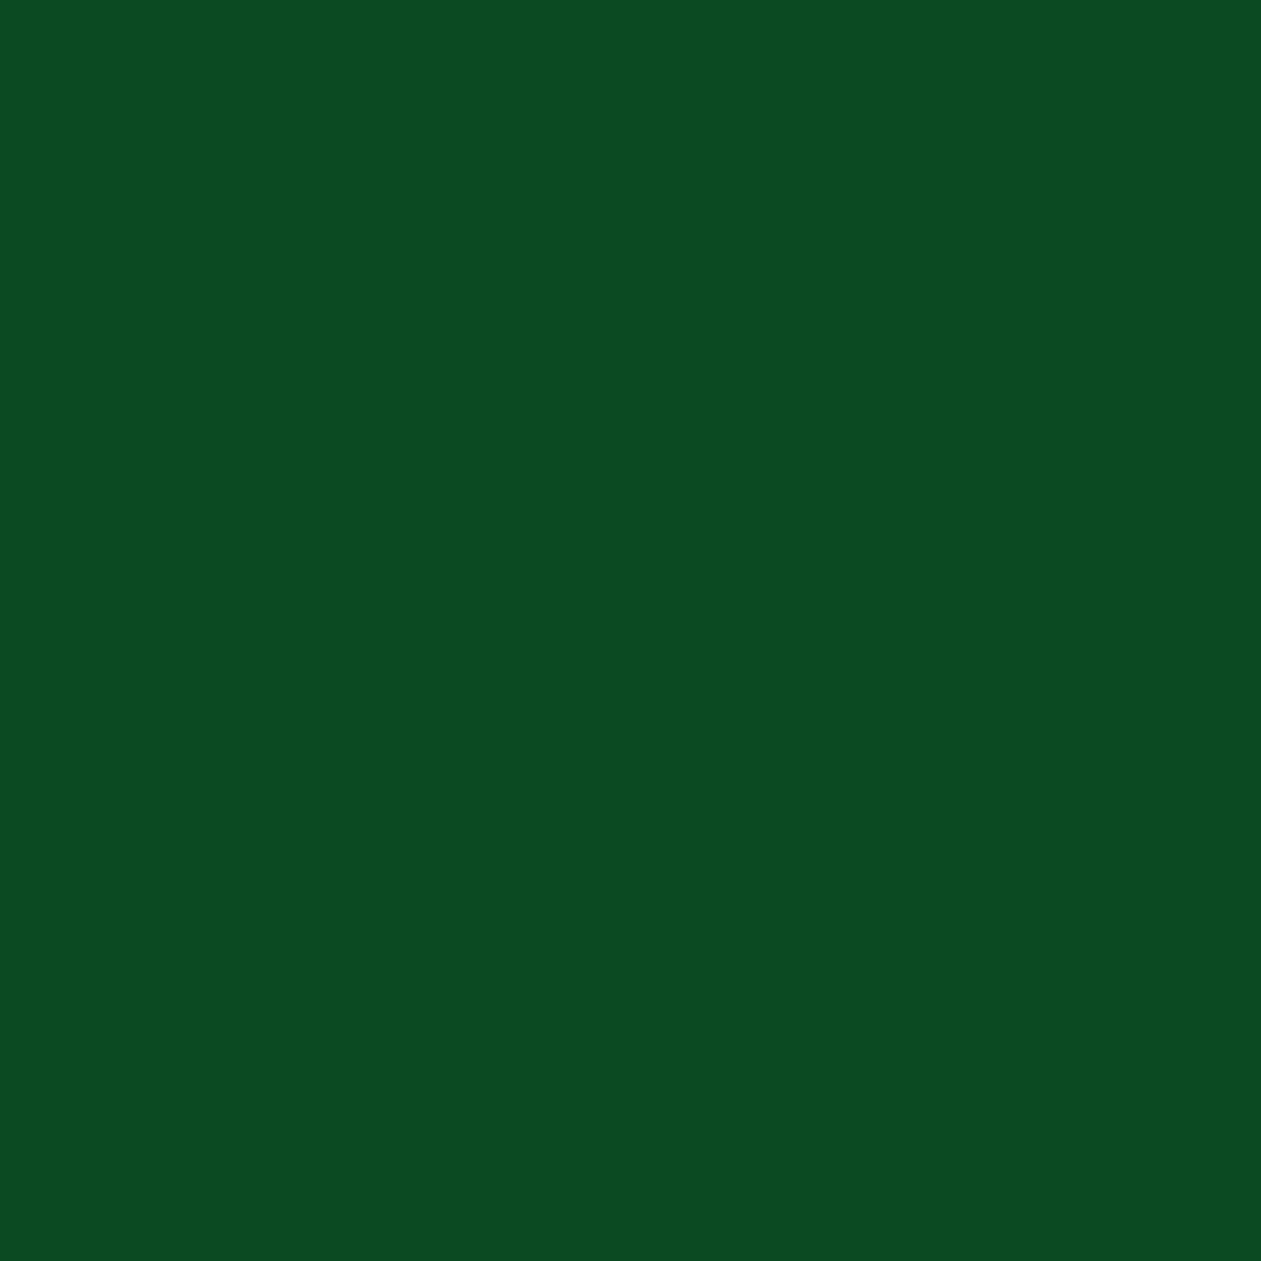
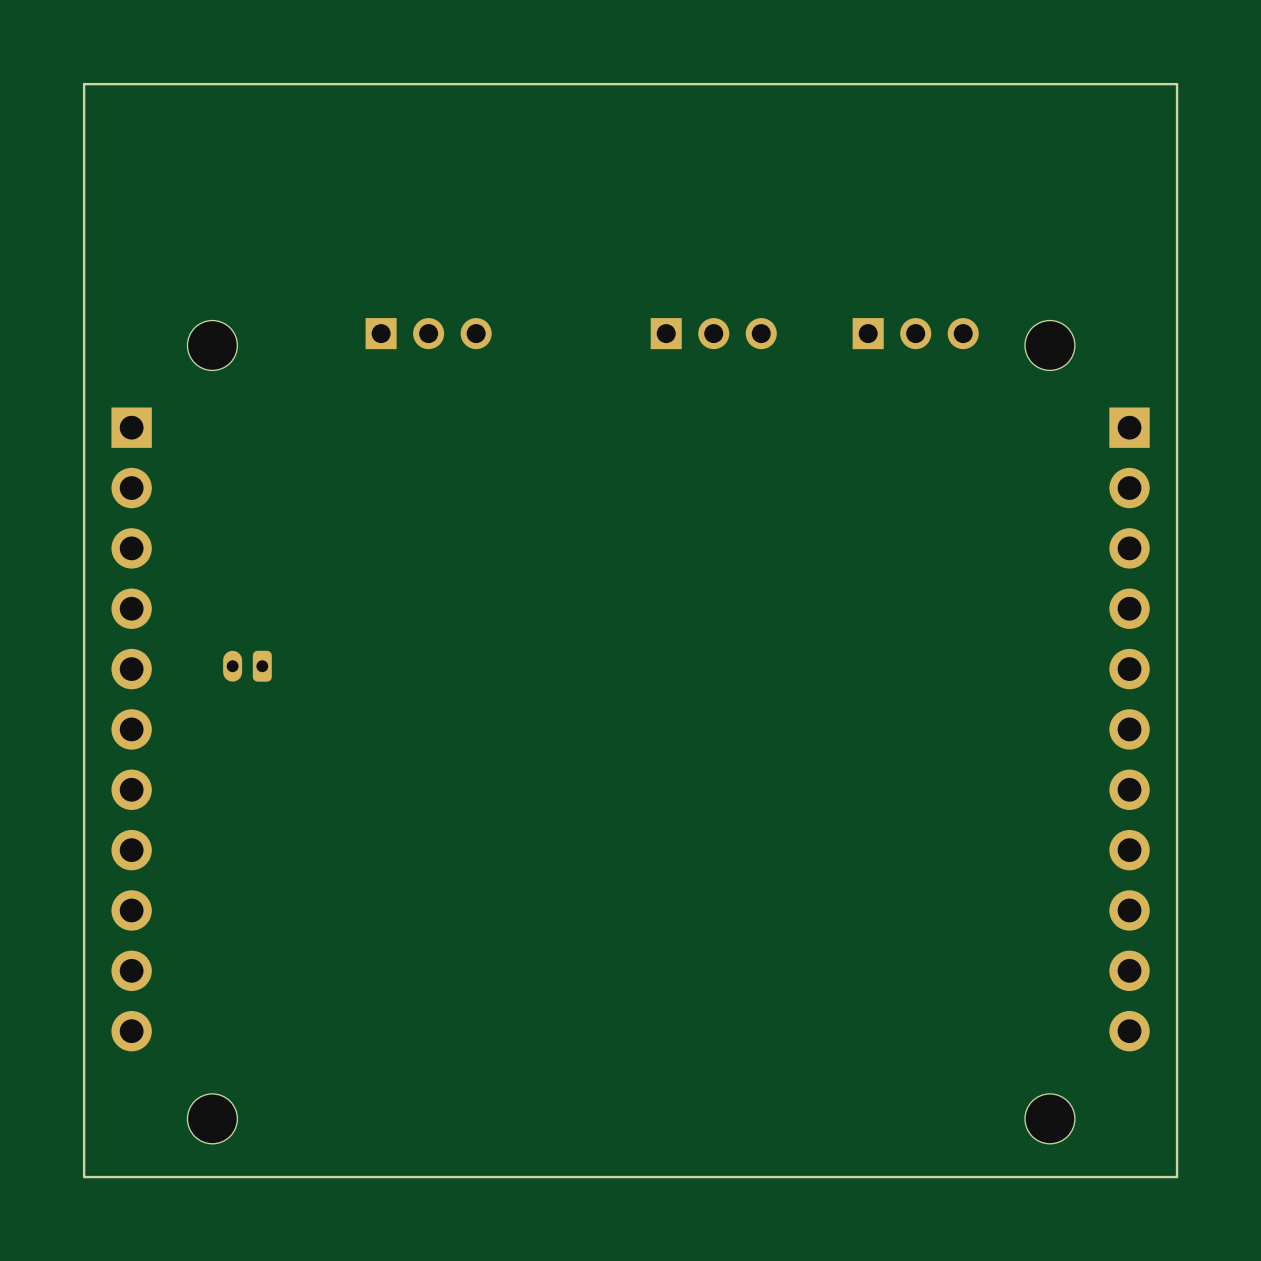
board edge: none -> (1177, 84) (84, 84) (84, 1177) (1177, 1177) (1177, 84)
part: none -> (428, 333)
part: none -> (713, 333)
part: none -> (915, 333)
part: none -> (212, 345)
part: none -> (1049, 345)
part: none -> (247, 666)
part: none -> (131, 729)
part: none -> (1129, 729)
part: none -> (212, 1118)
part: none -> (1049, 1118)

